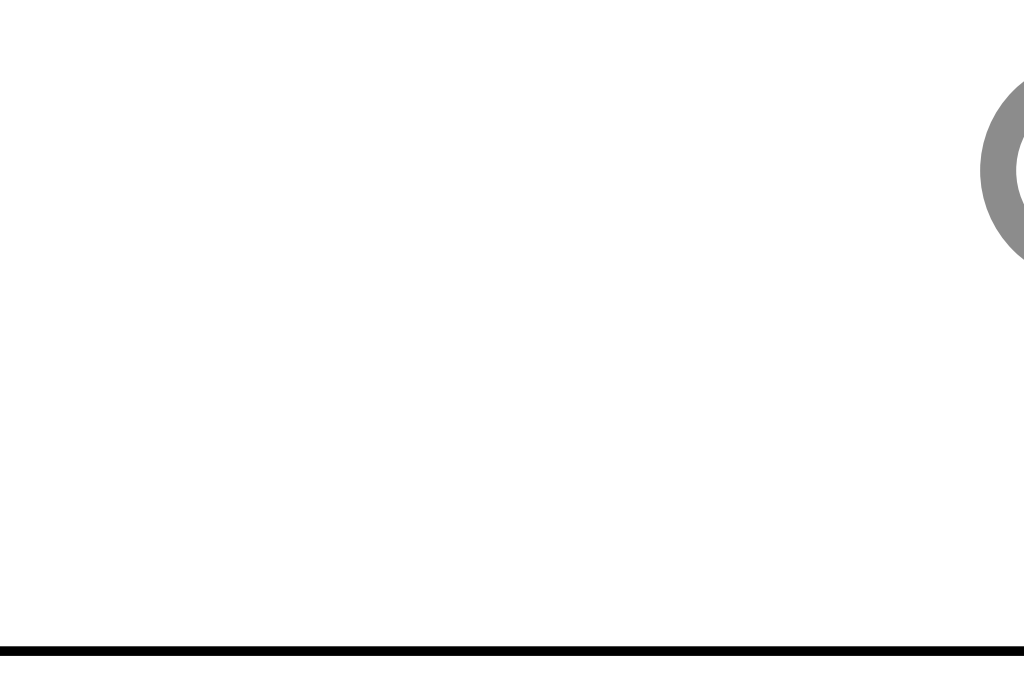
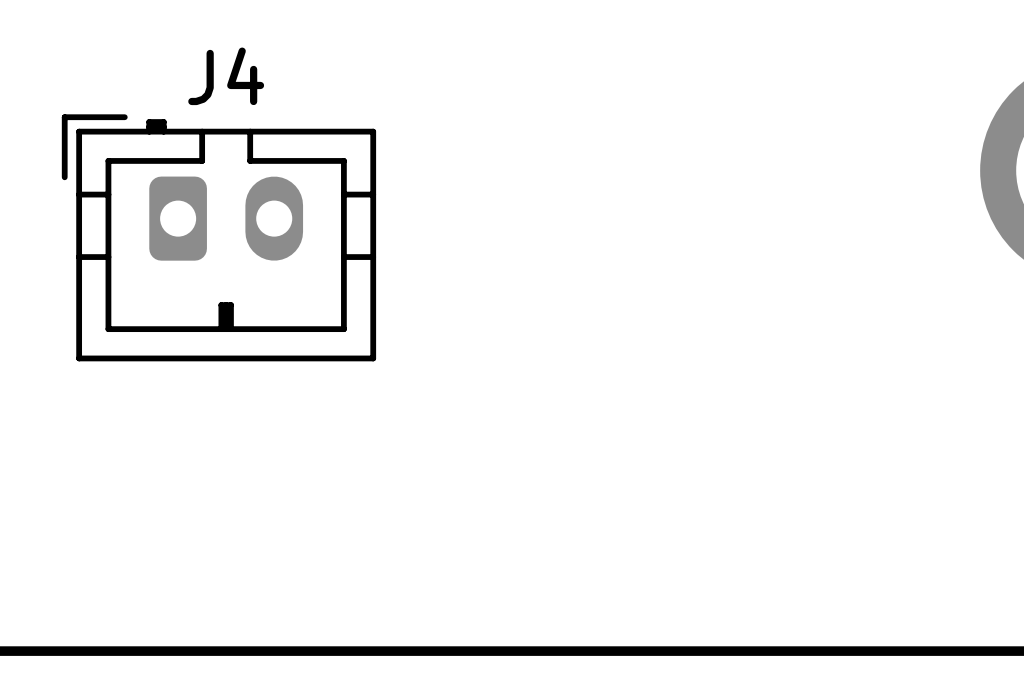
J4: none -> (218, 237)

